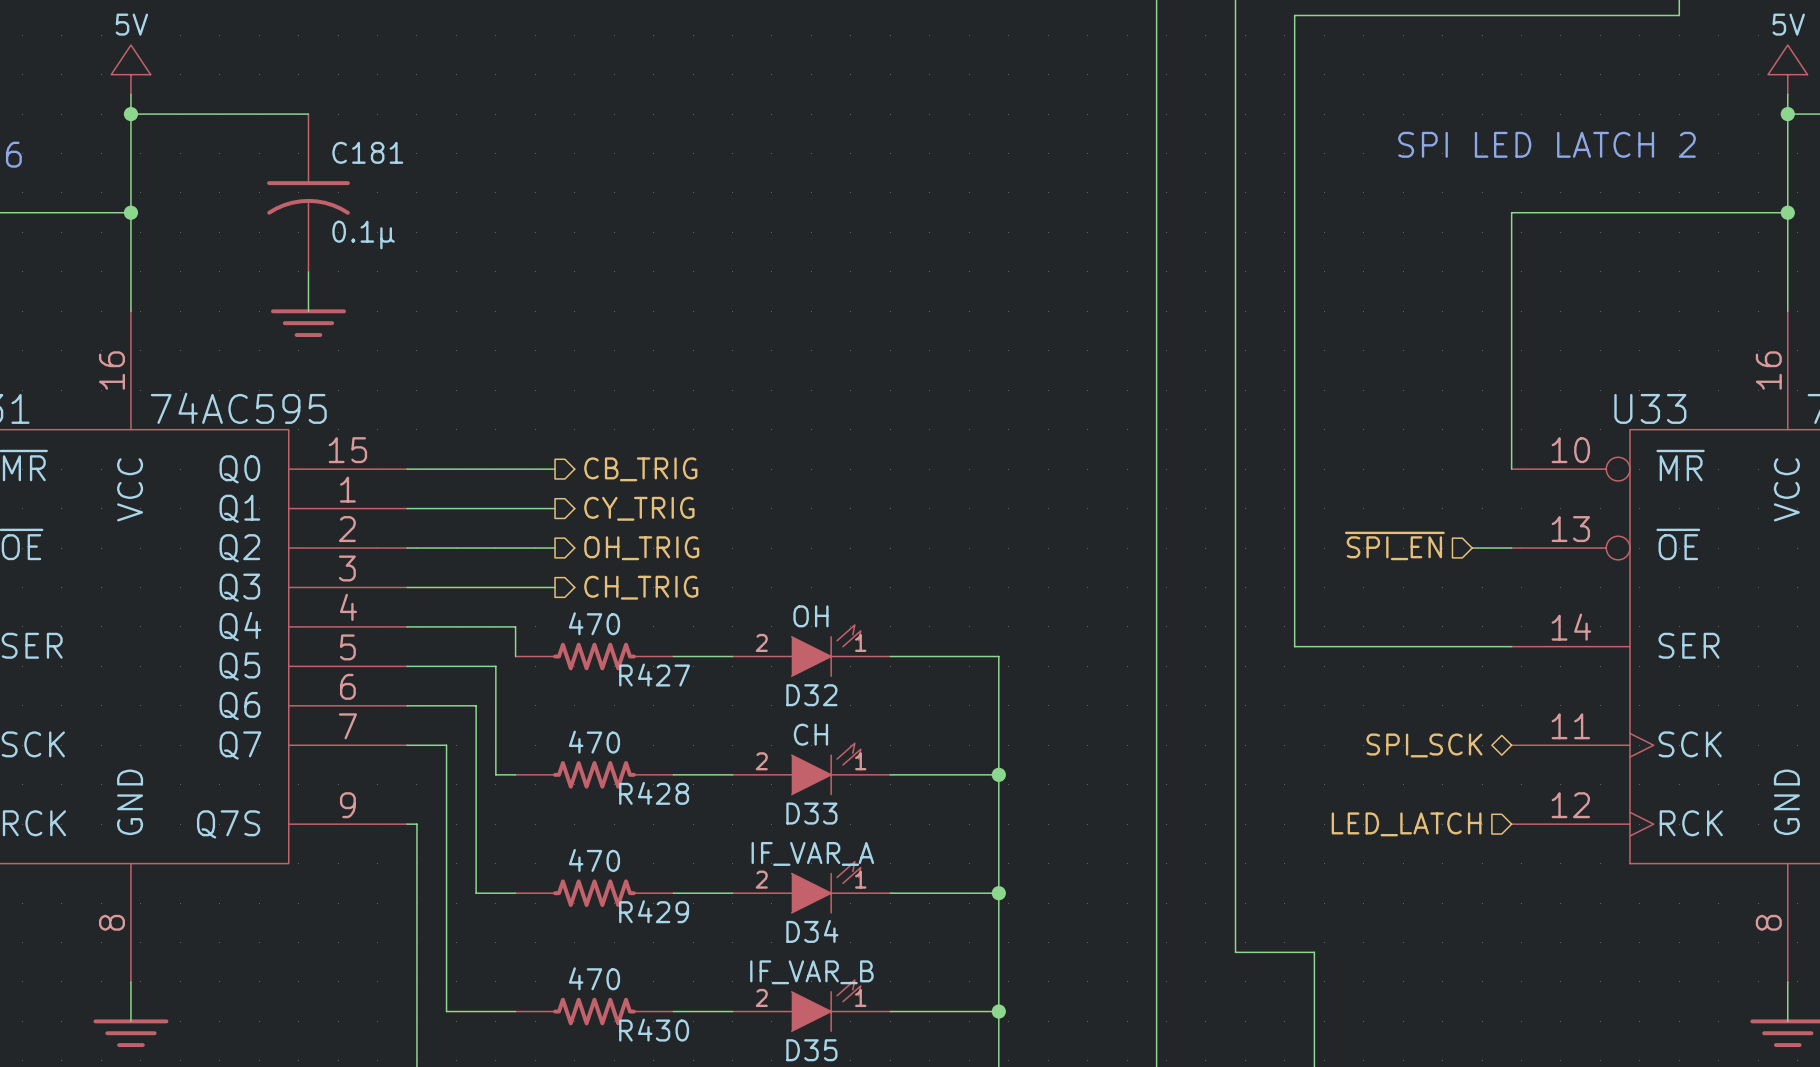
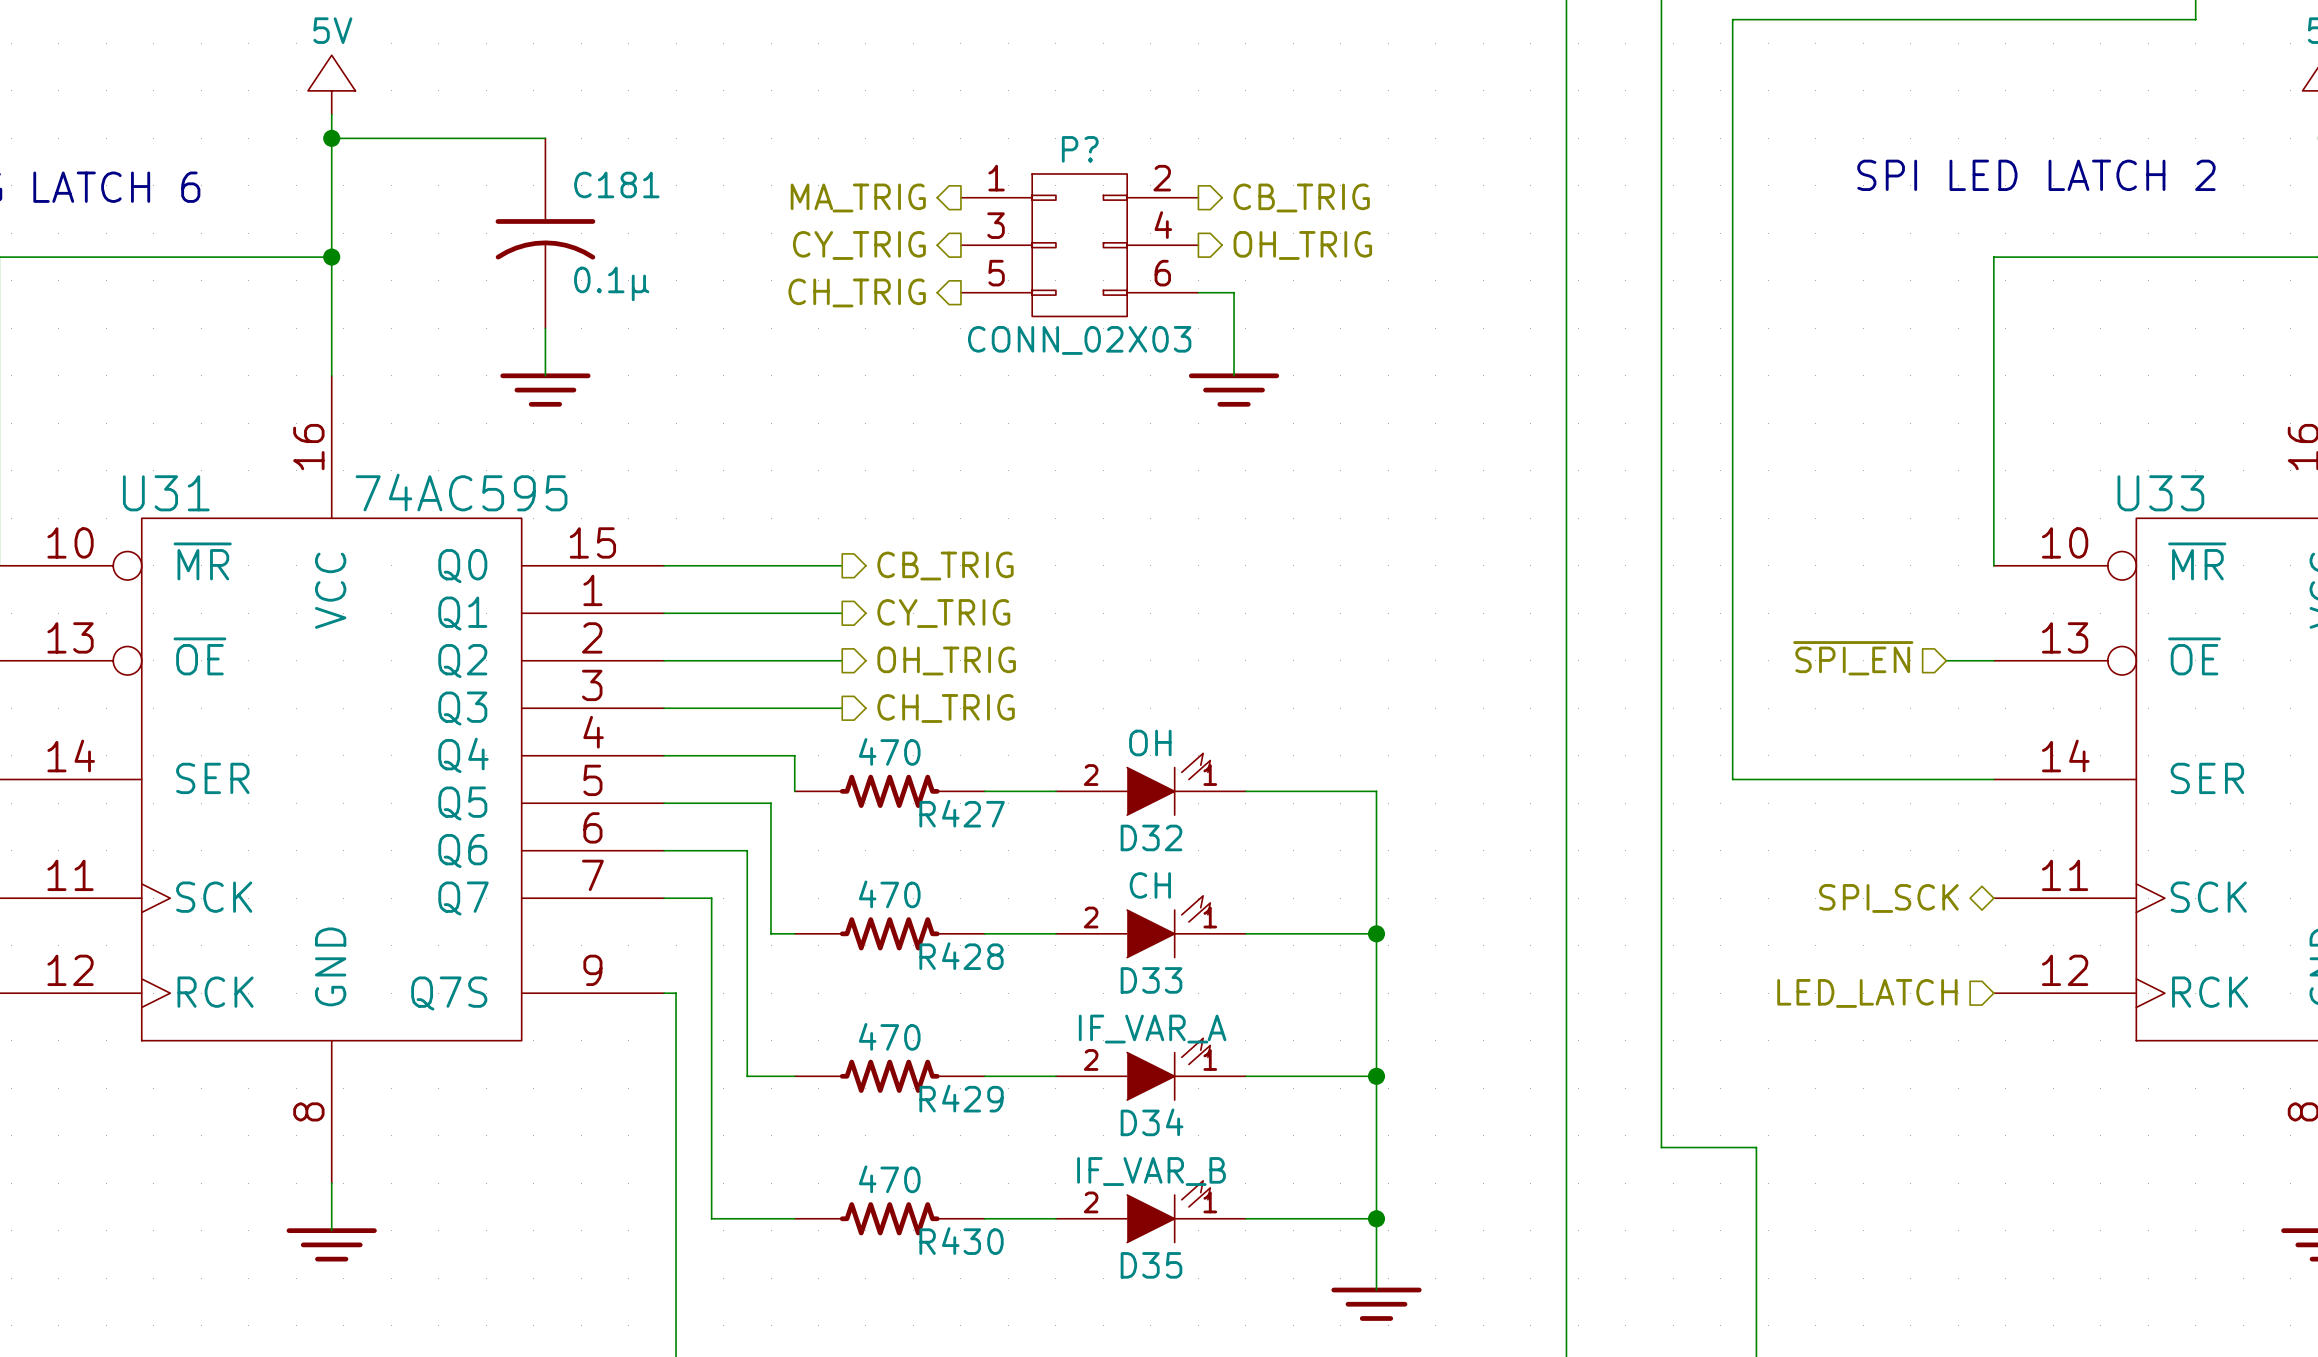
hierarchical label: none -> MA_TRIG (858, 197)
hierarchical label: none -> CB_TRIG (1301, 197)
P?: none -> CONN_02X03 (1079, 245)
hierarchical label: none -> CY_TRIG (859, 245)
hierarchical label: none -> OH_TRIG (1302, 245)
hierarchical label: none -> CH_TRIG (857, 292)
wire: none -> (1198, 292) (1234, 292) (1234, 375)
power symbol: none -> (1234, 390)

